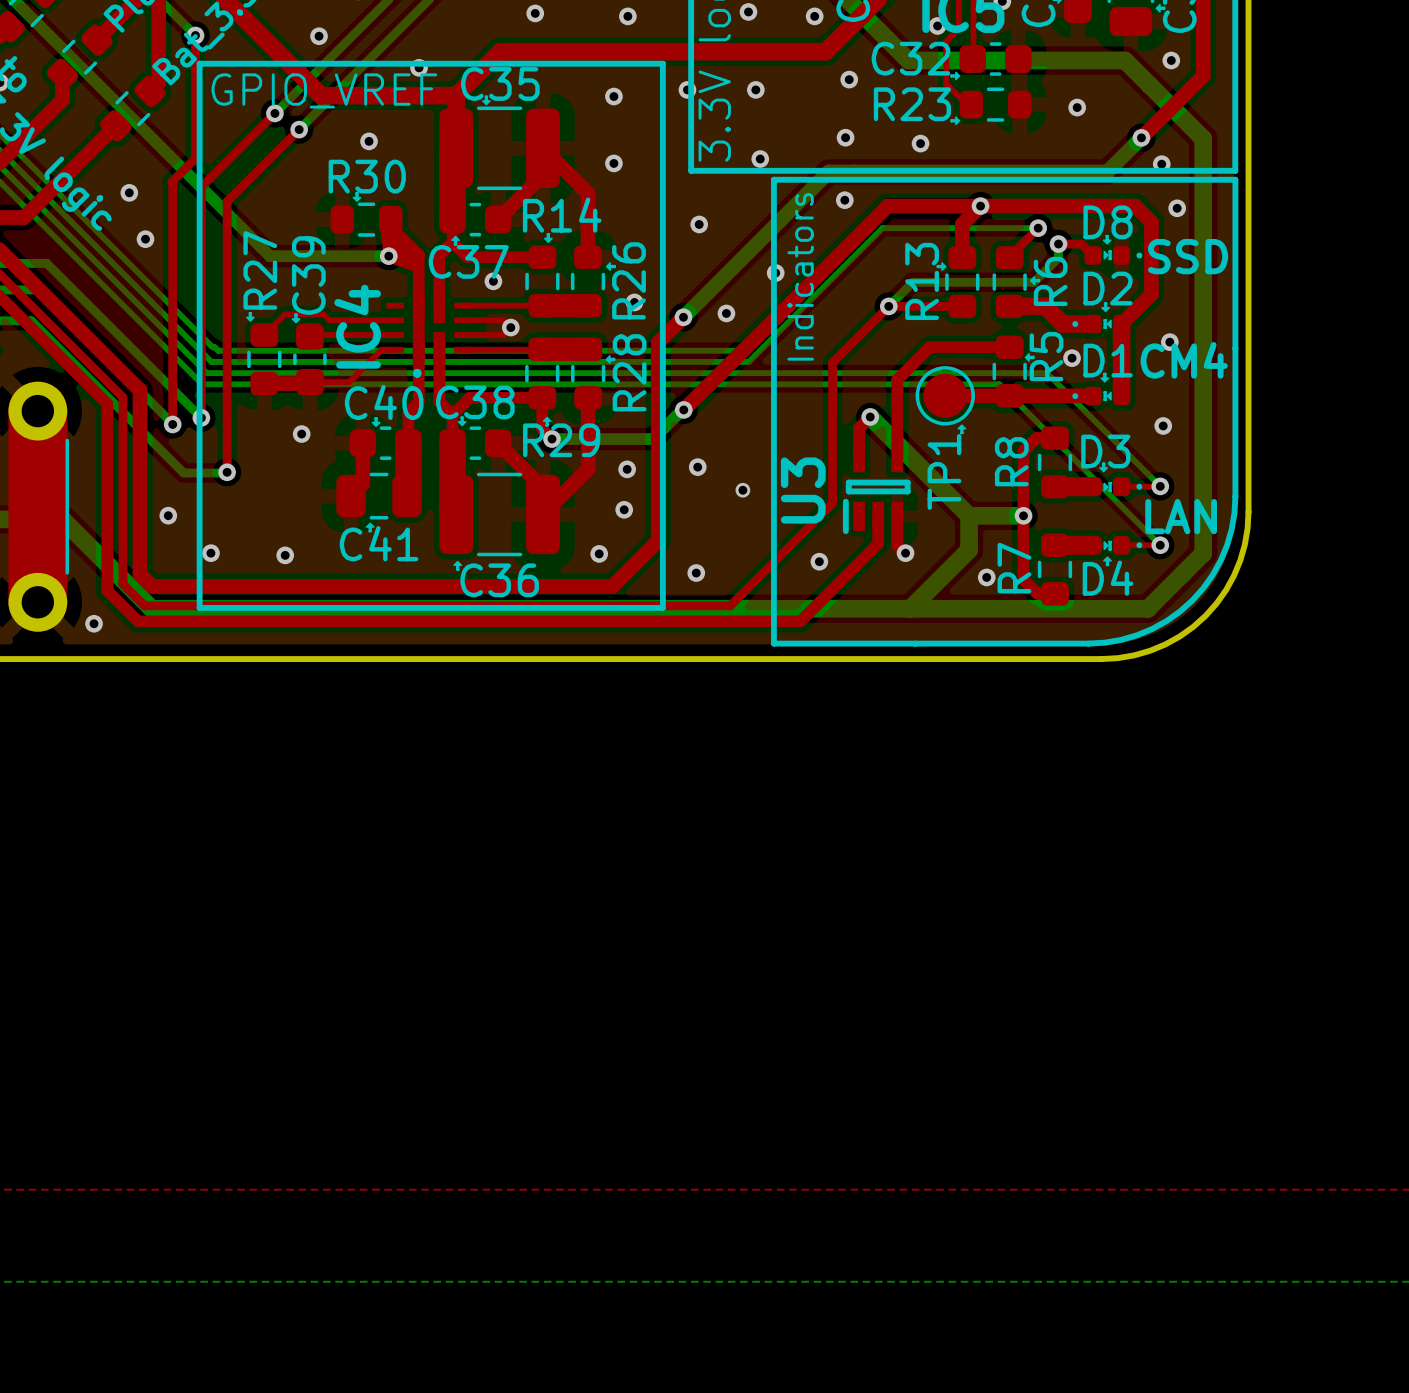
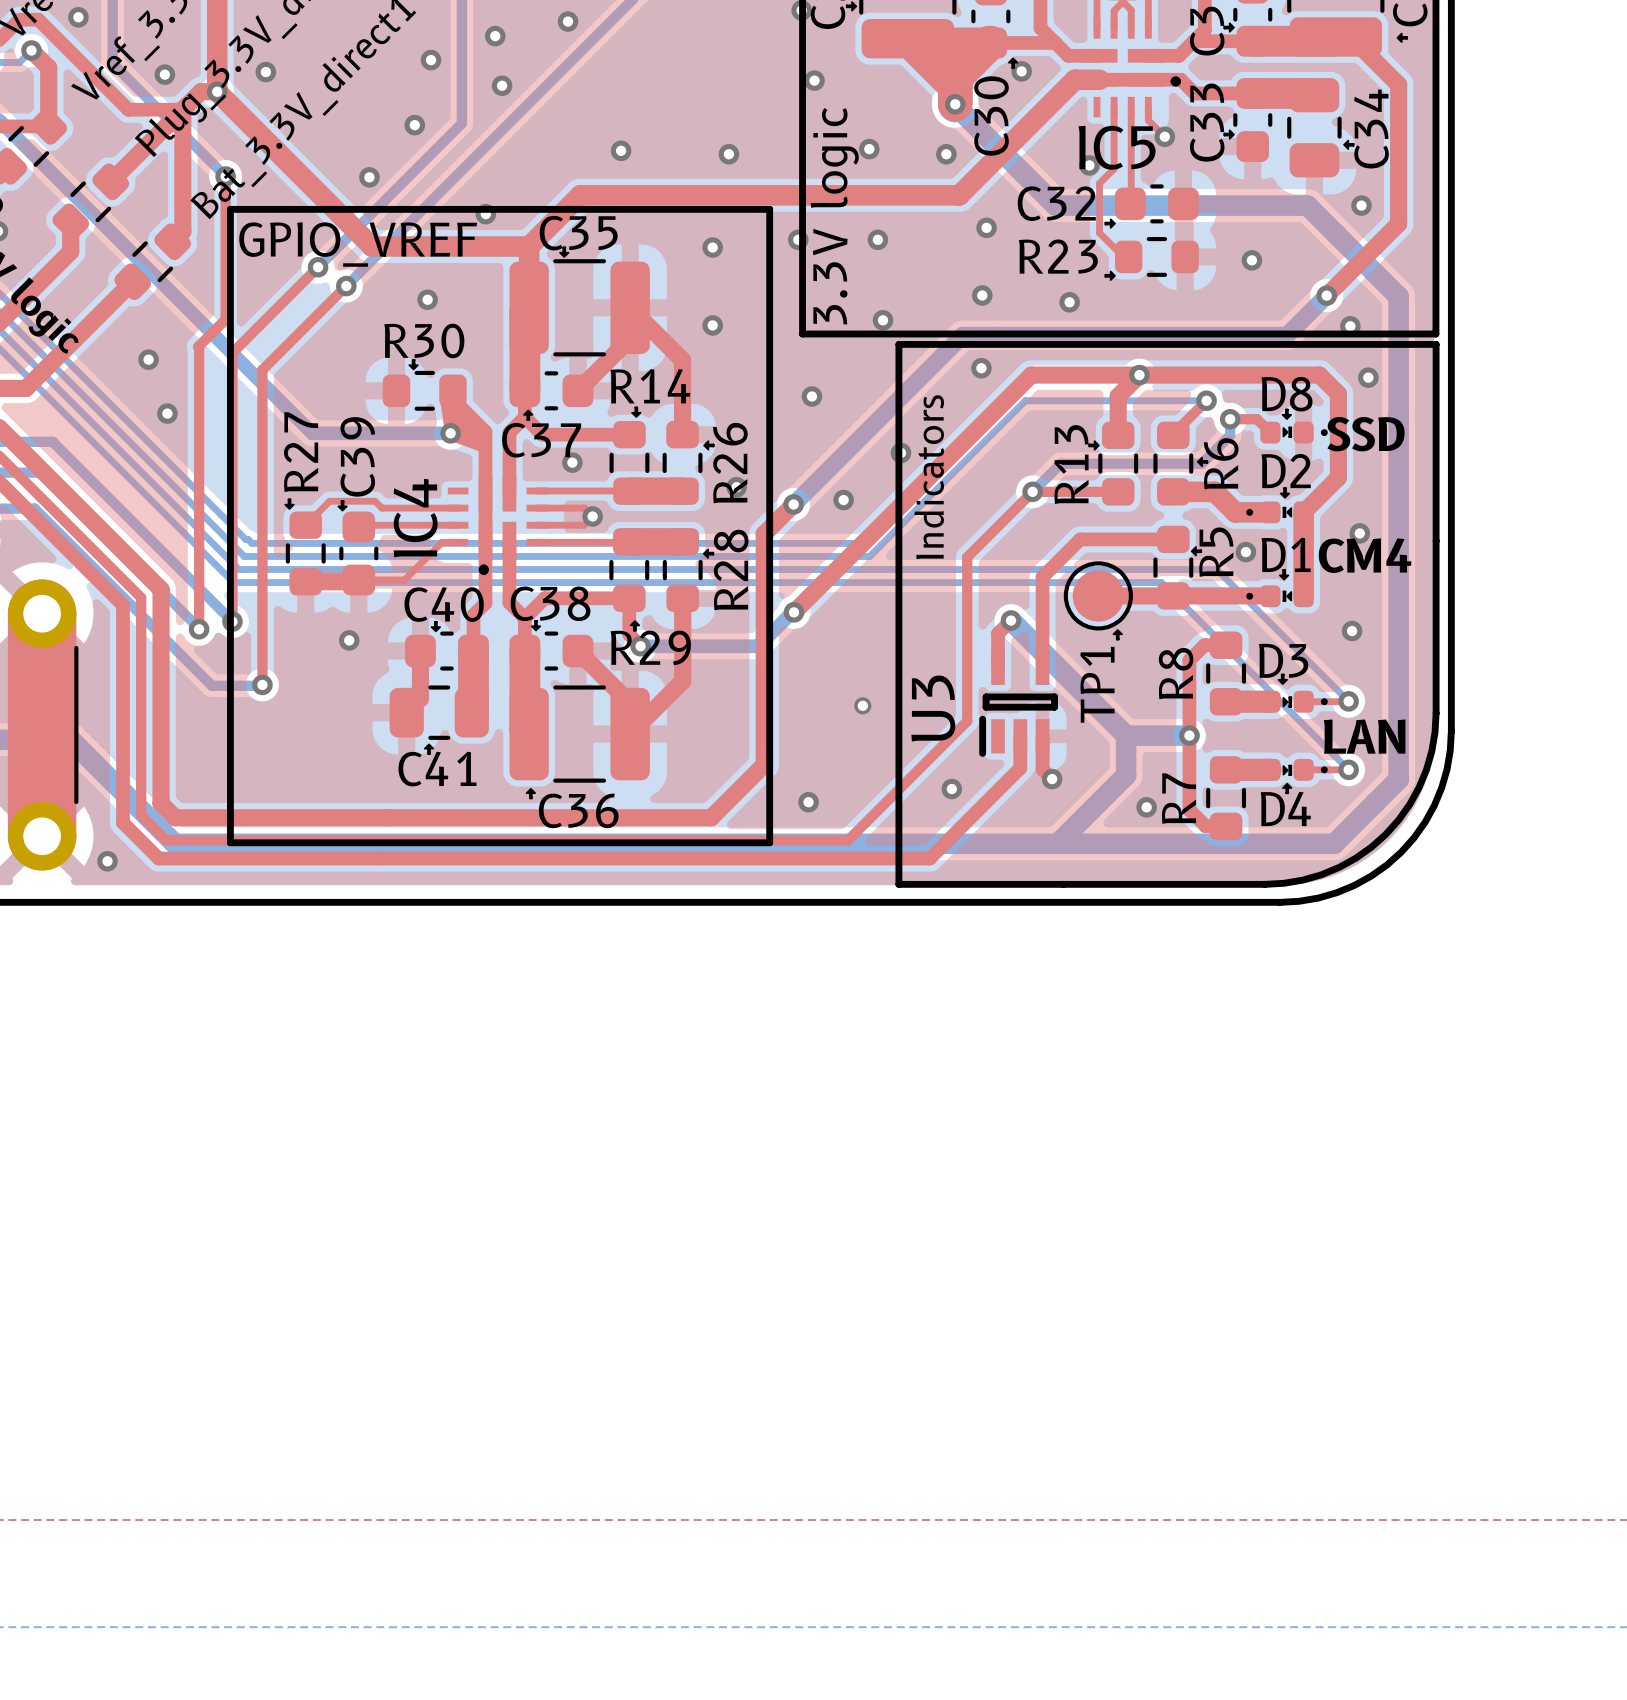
via: (697, 467) -> none
via: (627, 469) -> none
via: (624, 509) -> none
via: (168, 515) -> none
via: (210, 553) -> none
via: (599, 553) -> none
via: (285, 555) -> none

